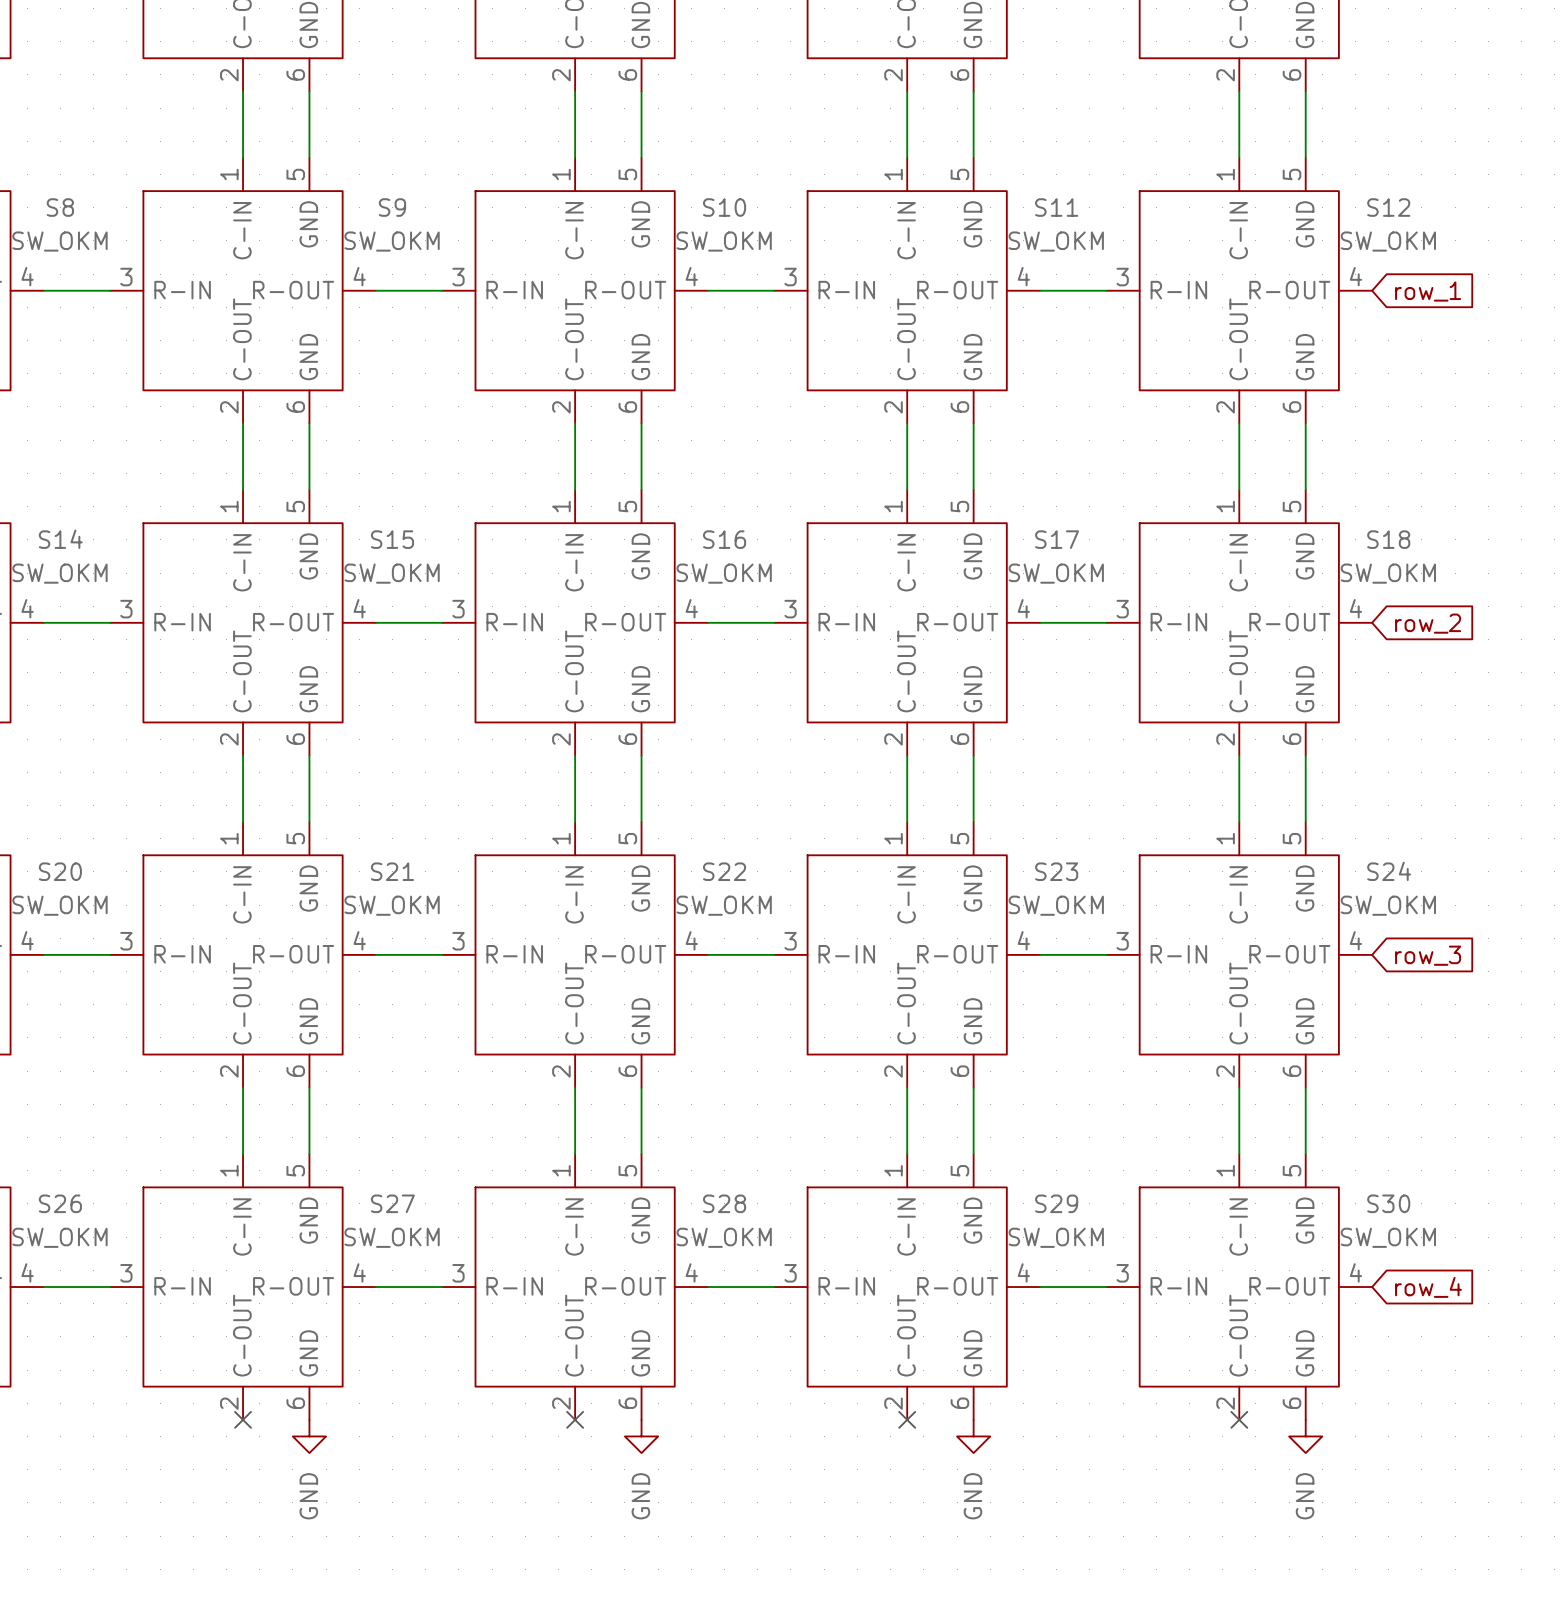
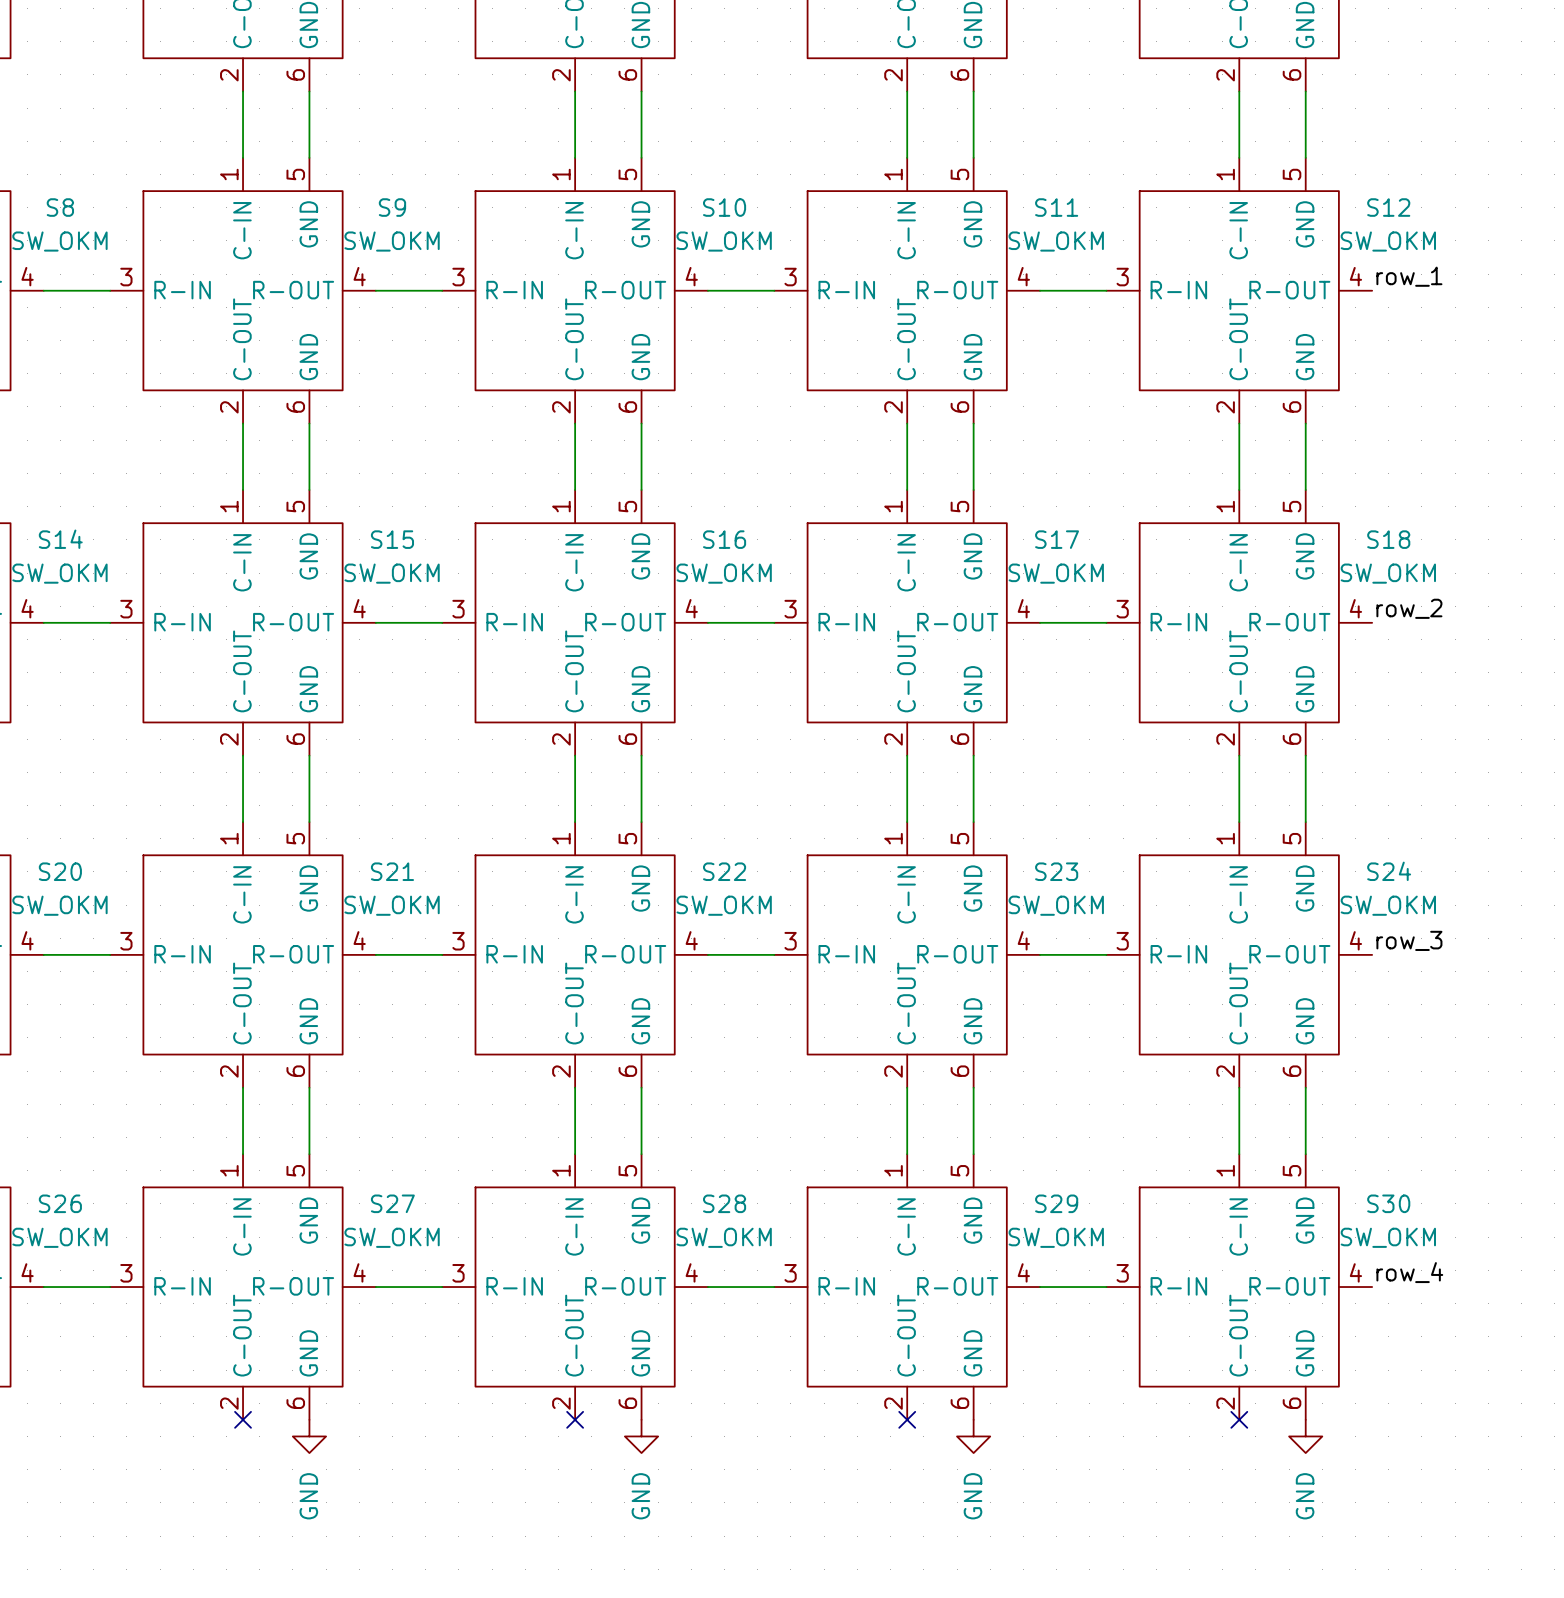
label: none -> row_1 (1409, 276)
global label: row_1 (1428, 291) -> none
label: none -> row_2 (1409, 608)
global label: row_2 (1428, 623) -> none
label: none -> row_3 (1409, 940)
global label: row_3 (1428, 955) -> none
label: none -> row_4 (1409, 1272)
global label: row_4 (1428, 1287) -> none

